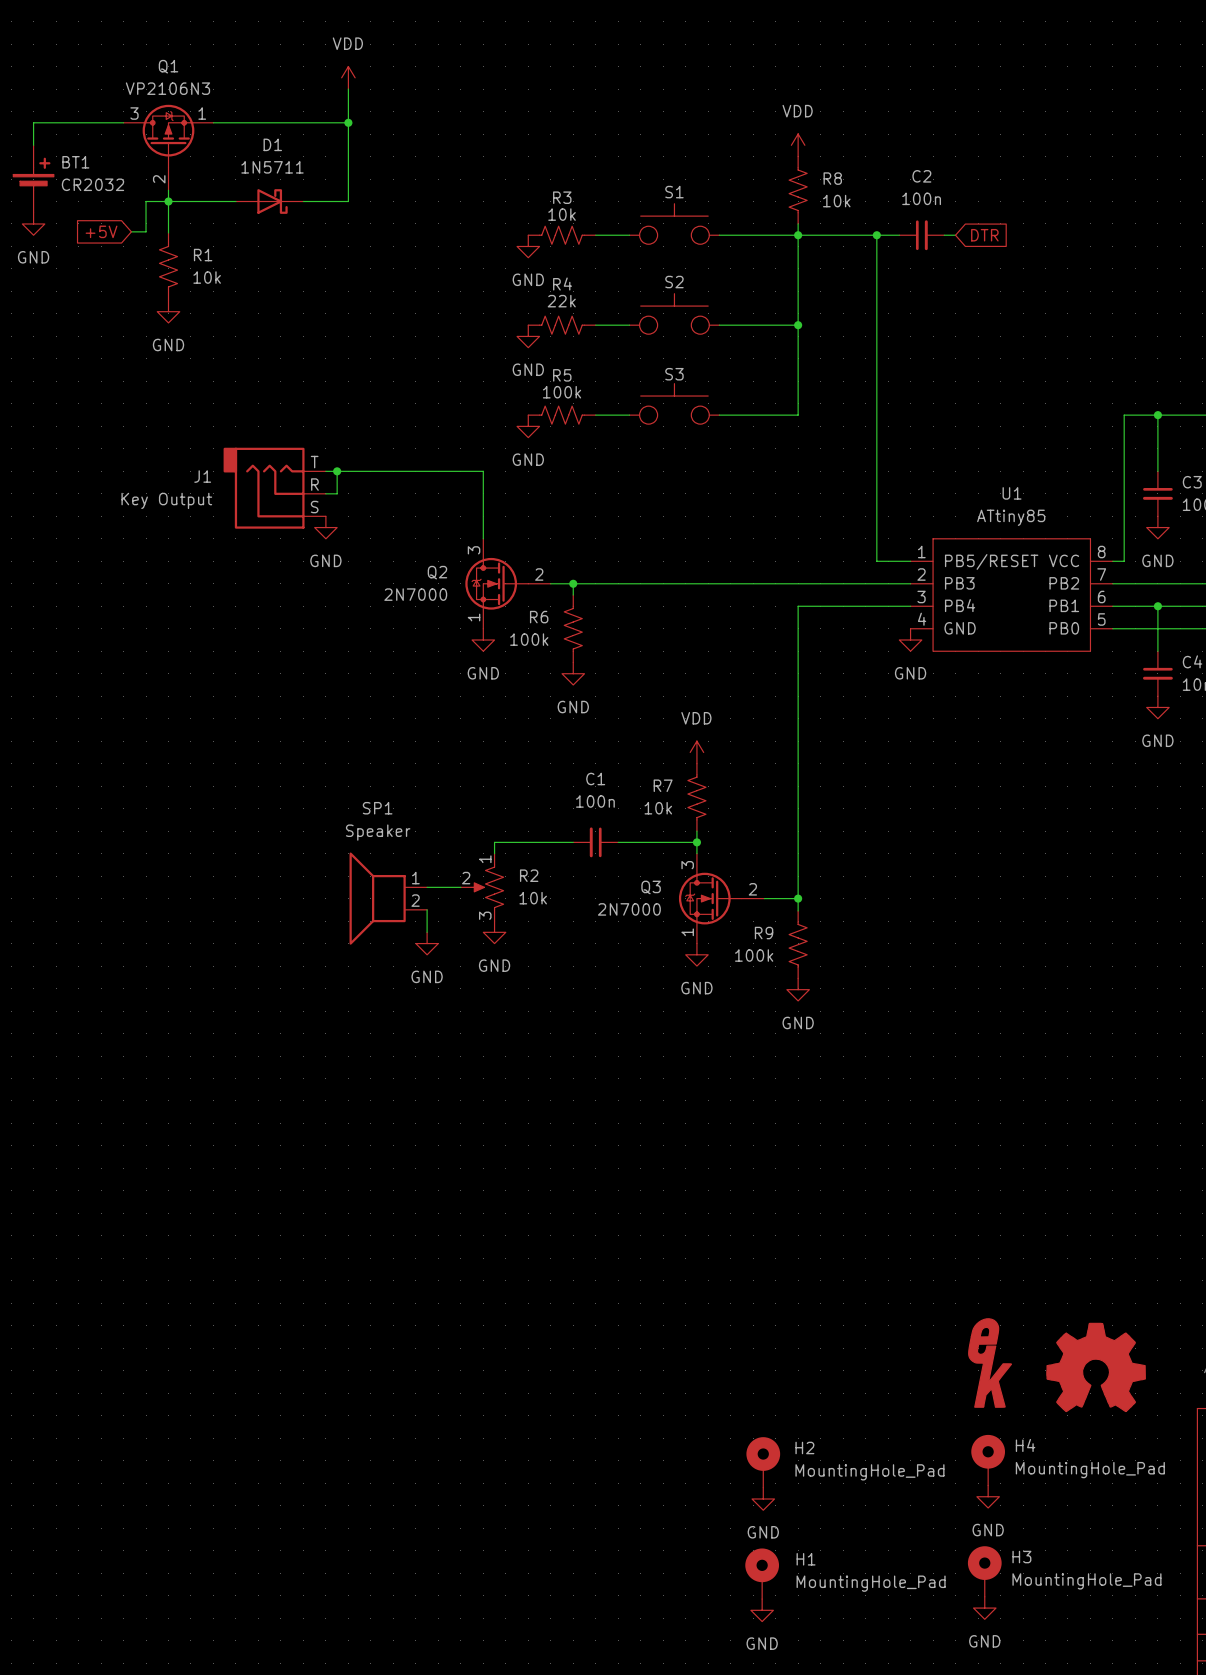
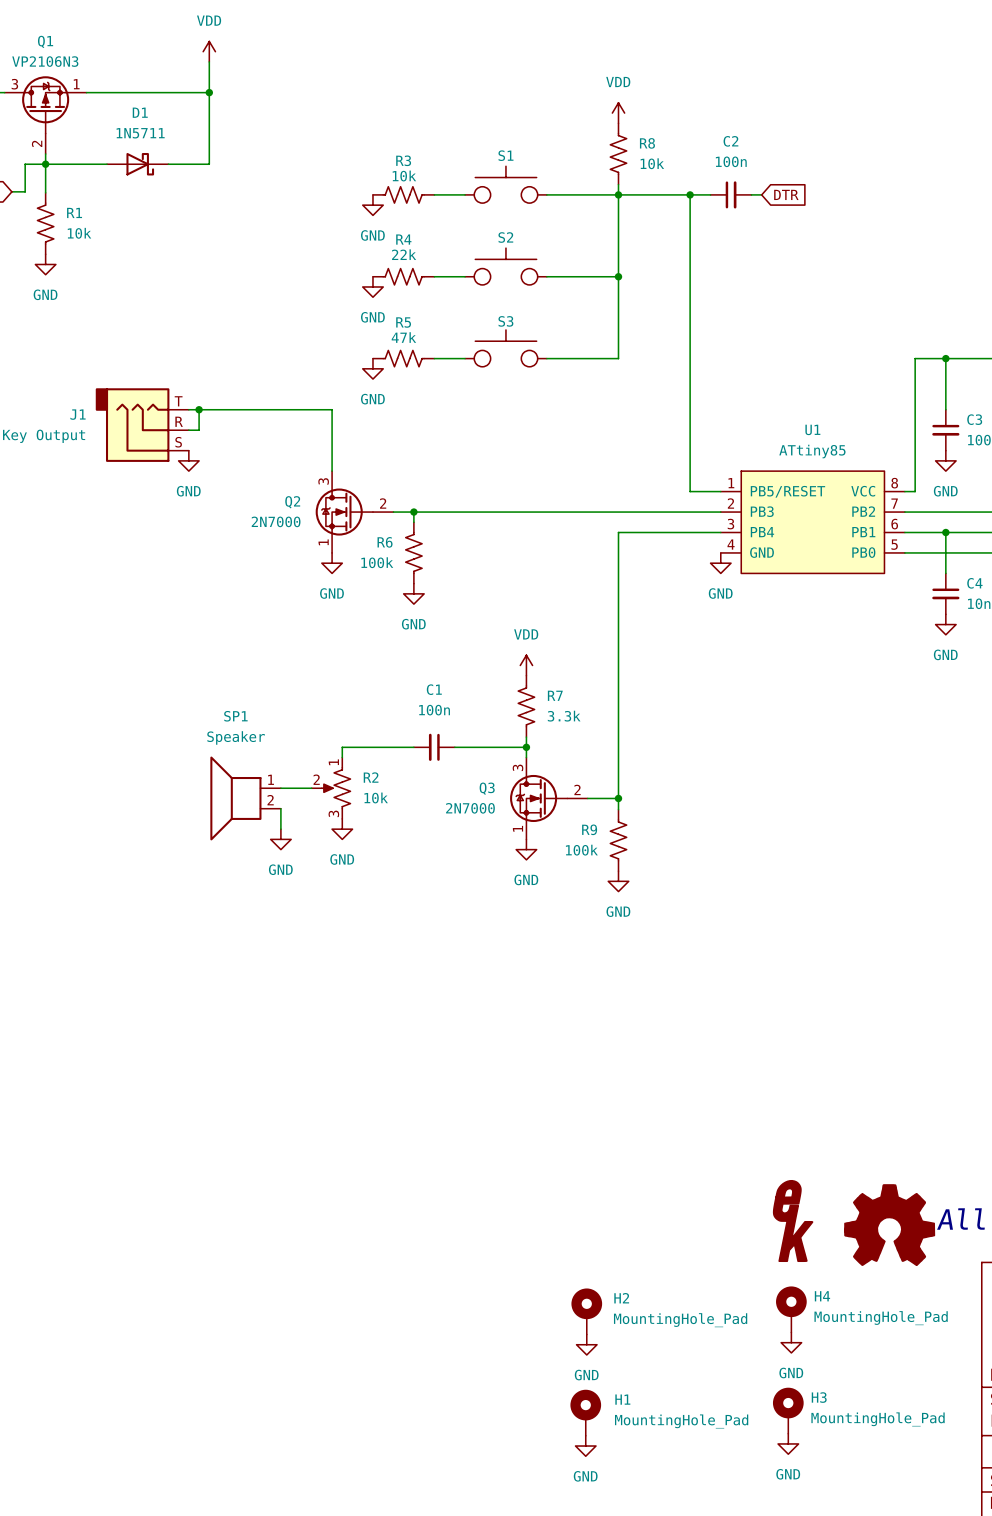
R5 value: 100k (562, 392) -> 47k (403, 337)
R7 name position: R7 (663, 785) -> R7 (555, 695)
R7 value: 10k (658, 808) -> 3.3k (564, 716)

